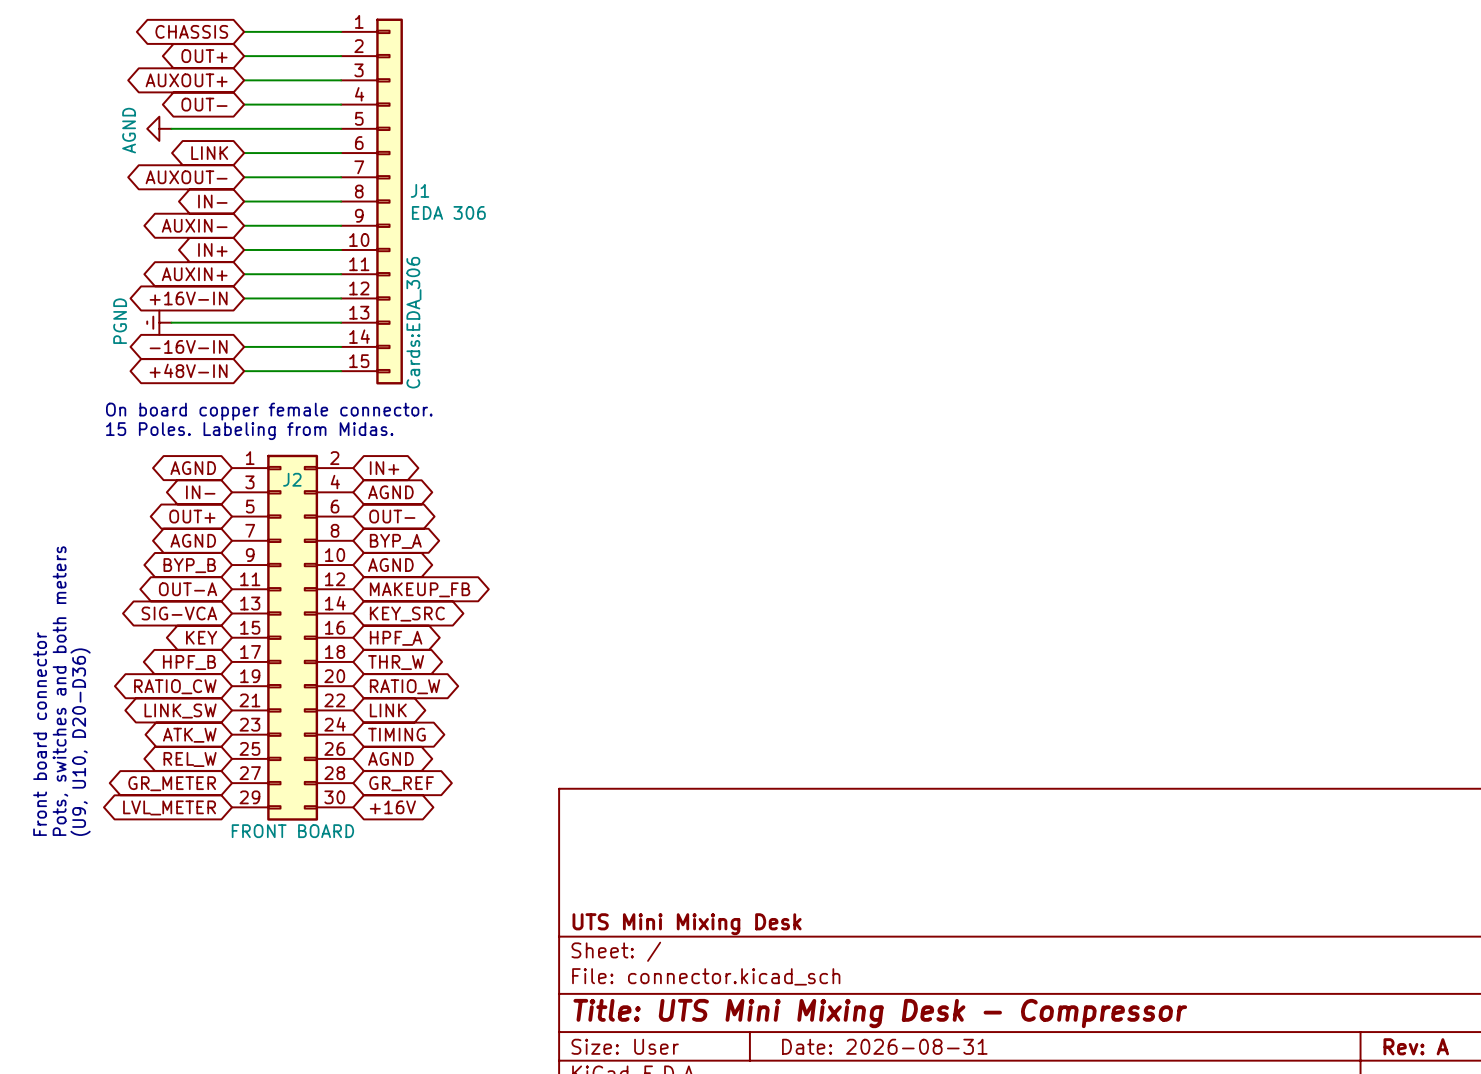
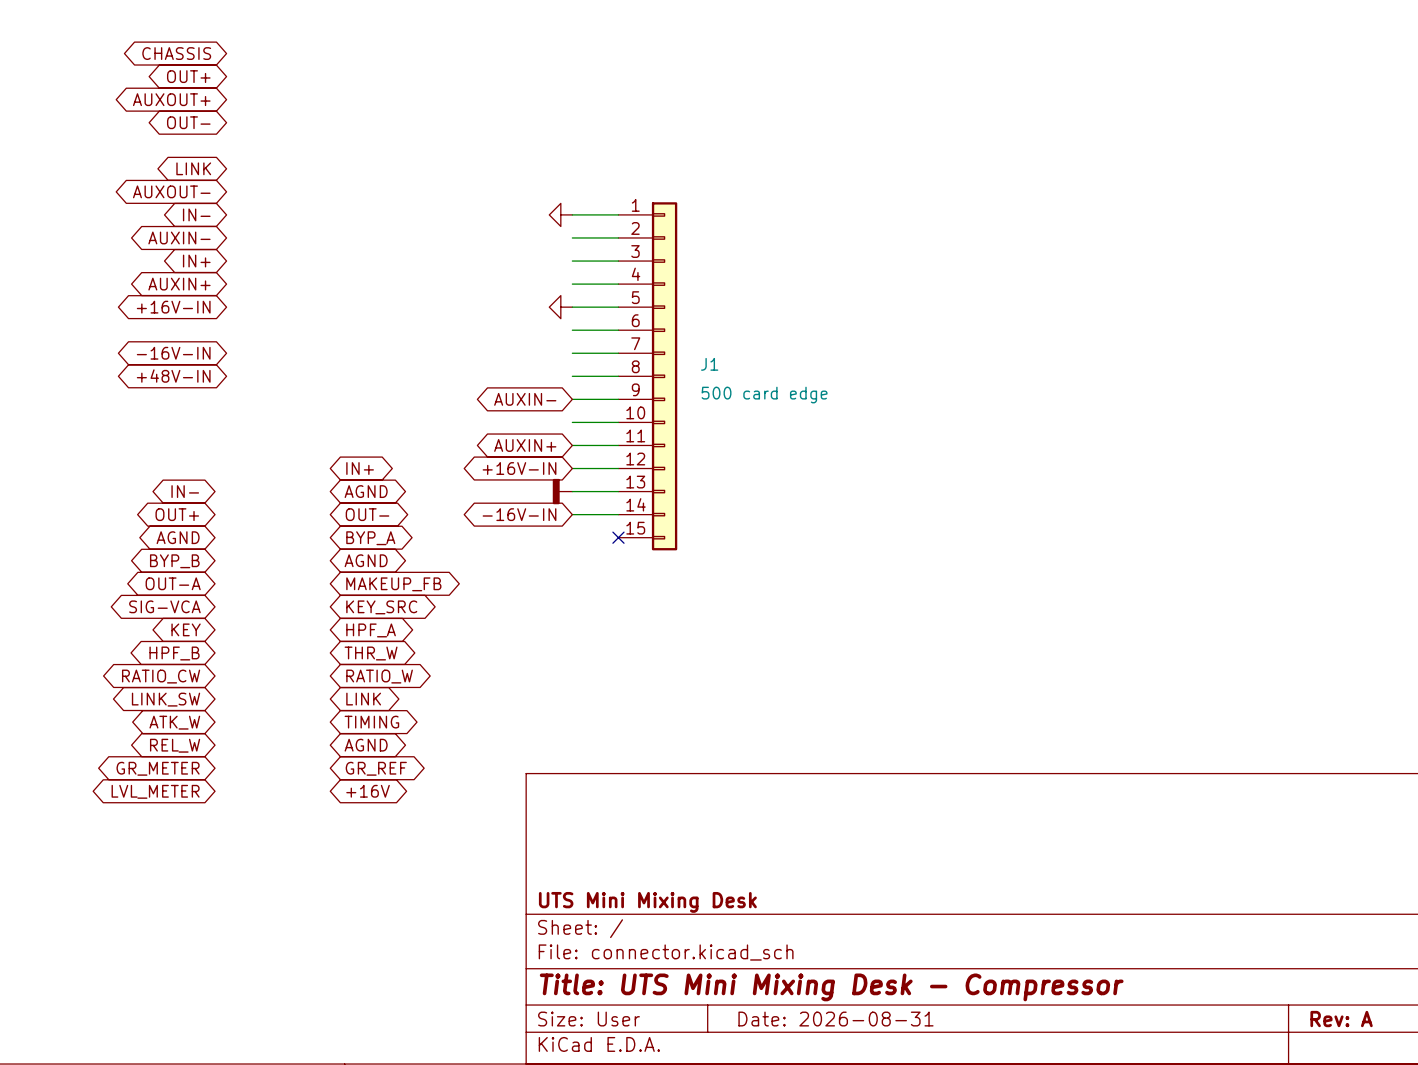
wire: (244, 31) (341, 31) -> none
wire: (244, 56) (341, 56) -> none
wire: (244, 80) (341, 80) -> none
wire: (244, 104) (341, 104) -> none
power symbol: AGND (159, 128) -> none
wire: (171, 128) (341, 128) -> none
wire: (244, 153) (341, 153) -> none
wire: (244, 177) (341, 177) -> none
J1 name position: J1 (420, 190) -> J1 (709, 364)
wire: (244, 201) (341, 201) -> none
J1 position: (372, 201) -> (647, 376)
power symbol: none -> (560, 214)
wire: none -> (572, 214) (618, 214)
J1 value: EDA 306 (448, 212) -> 500 card edge (764, 395)
wire: (244, 225) (341, 225) -> none
wire: none -> (572, 237) (618, 237)
wire: (244, 249) (341, 249) -> none
wire: none -> (572, 261) (618, 261)
wire: (244, 274) (341, 274) -> none
wire: none -> (572, 284) (618, 284)
wire: (244, 298) (341, 298) -> none
power symbol: none -> (560, 307)
wire: none -> (572, 307) (618, 307)
power symbol: PGND (159, 322) -> none
wire: (171, 322) (341, 322) -> none
J1 text: Cards:EDA_306 (413, 322) -> none
wire: none -> (572, 330) (618, 330)
wire: (244, 346) (341, 346) -> none
wire: none -> (572, 353) (618, 353)
wire: (244, 371) (341, 371) -> none
wire: none -> (572, 376) (618, 376)
global label: none -> AUXIN- (525, 399)
wire: none -> (572, 399) (618, 399)
text: On board copper female connector. (269, 411) -> none
wire: none -> (572, 422) (618, 422)
text: 15 Poles. Labeling from Midas. (249, 431) -> none
global label: none -> AUXIN+ (525, 445)
wire: none -> (572, 445) (618, 445)
global label: AGND (193, 468) -> none
global label: none -> +16V-IN (519, 468)
wire: none -> (572, 468) (618, 468)
power symbol: none -> (562, 491)
wire: none -> (572, 491) (618, 491)
global label: none -> -16V-IN (519, 514)
wire: none -> (572, 514) (618, 514)
no-connect mark: none -> (618, 537)
J2: FRONT BOARD (292, 637) -> none
text: Pots, switches and both meters (60, 691) -> none
text: Front board connector (40, 734) -> none
text: (U9, U10, D20-D36) (80, 742) -> none

